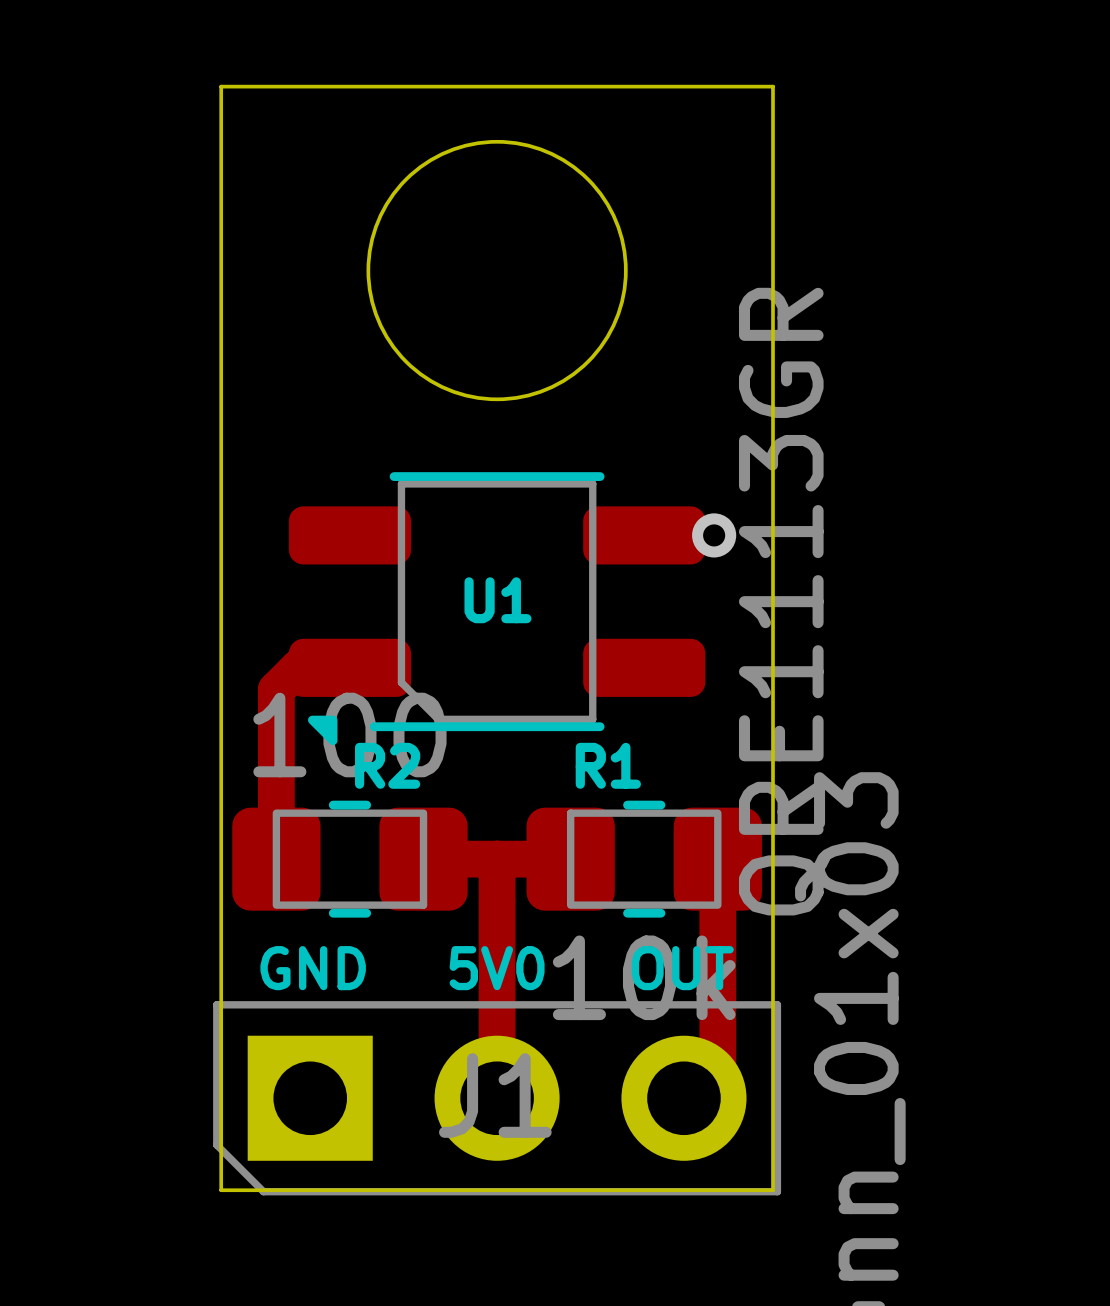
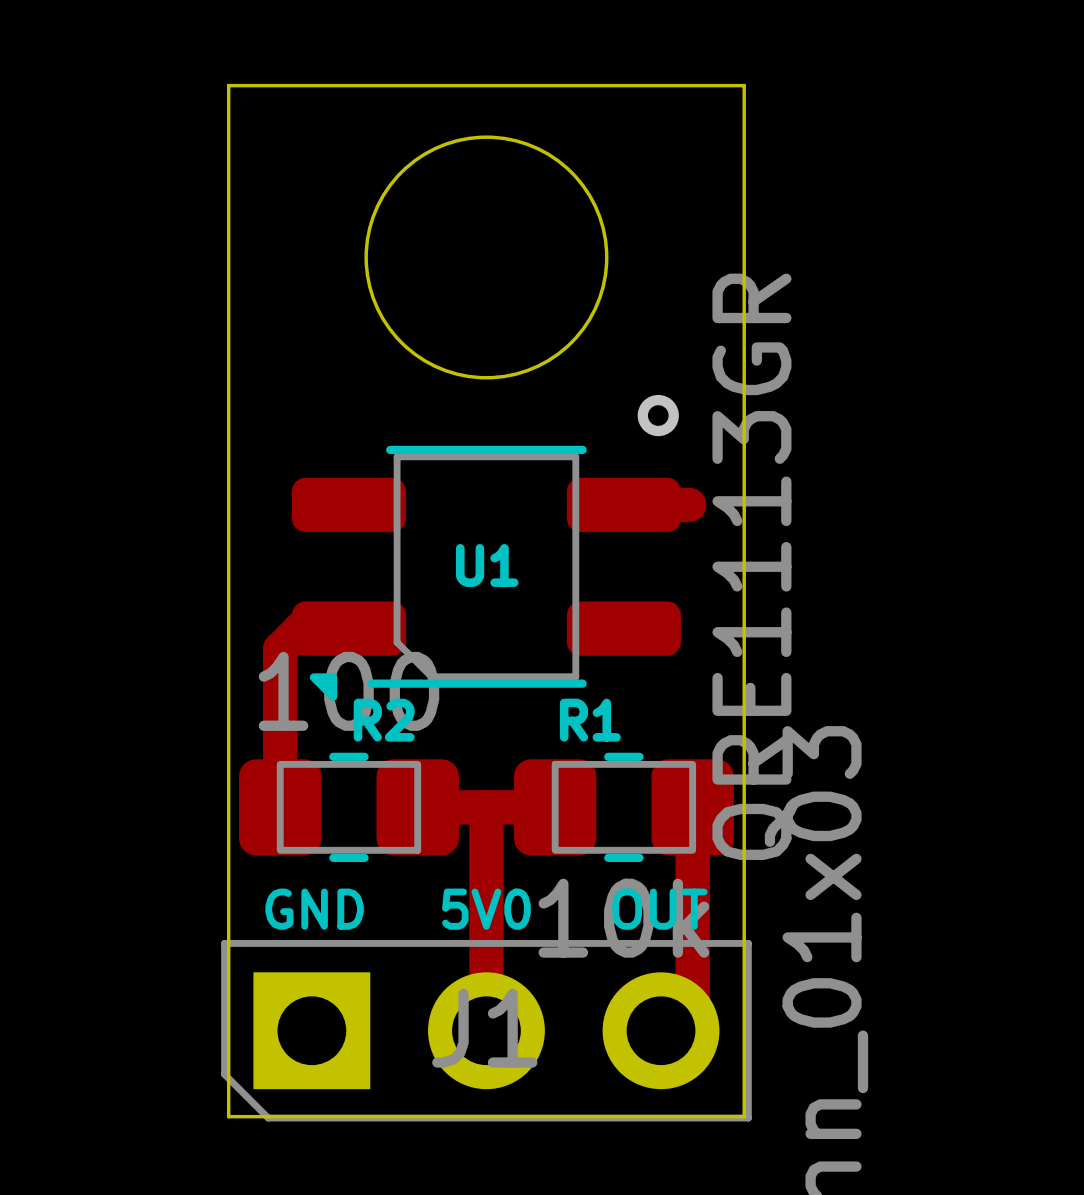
via position: (714, 535) -> (658, 415)

